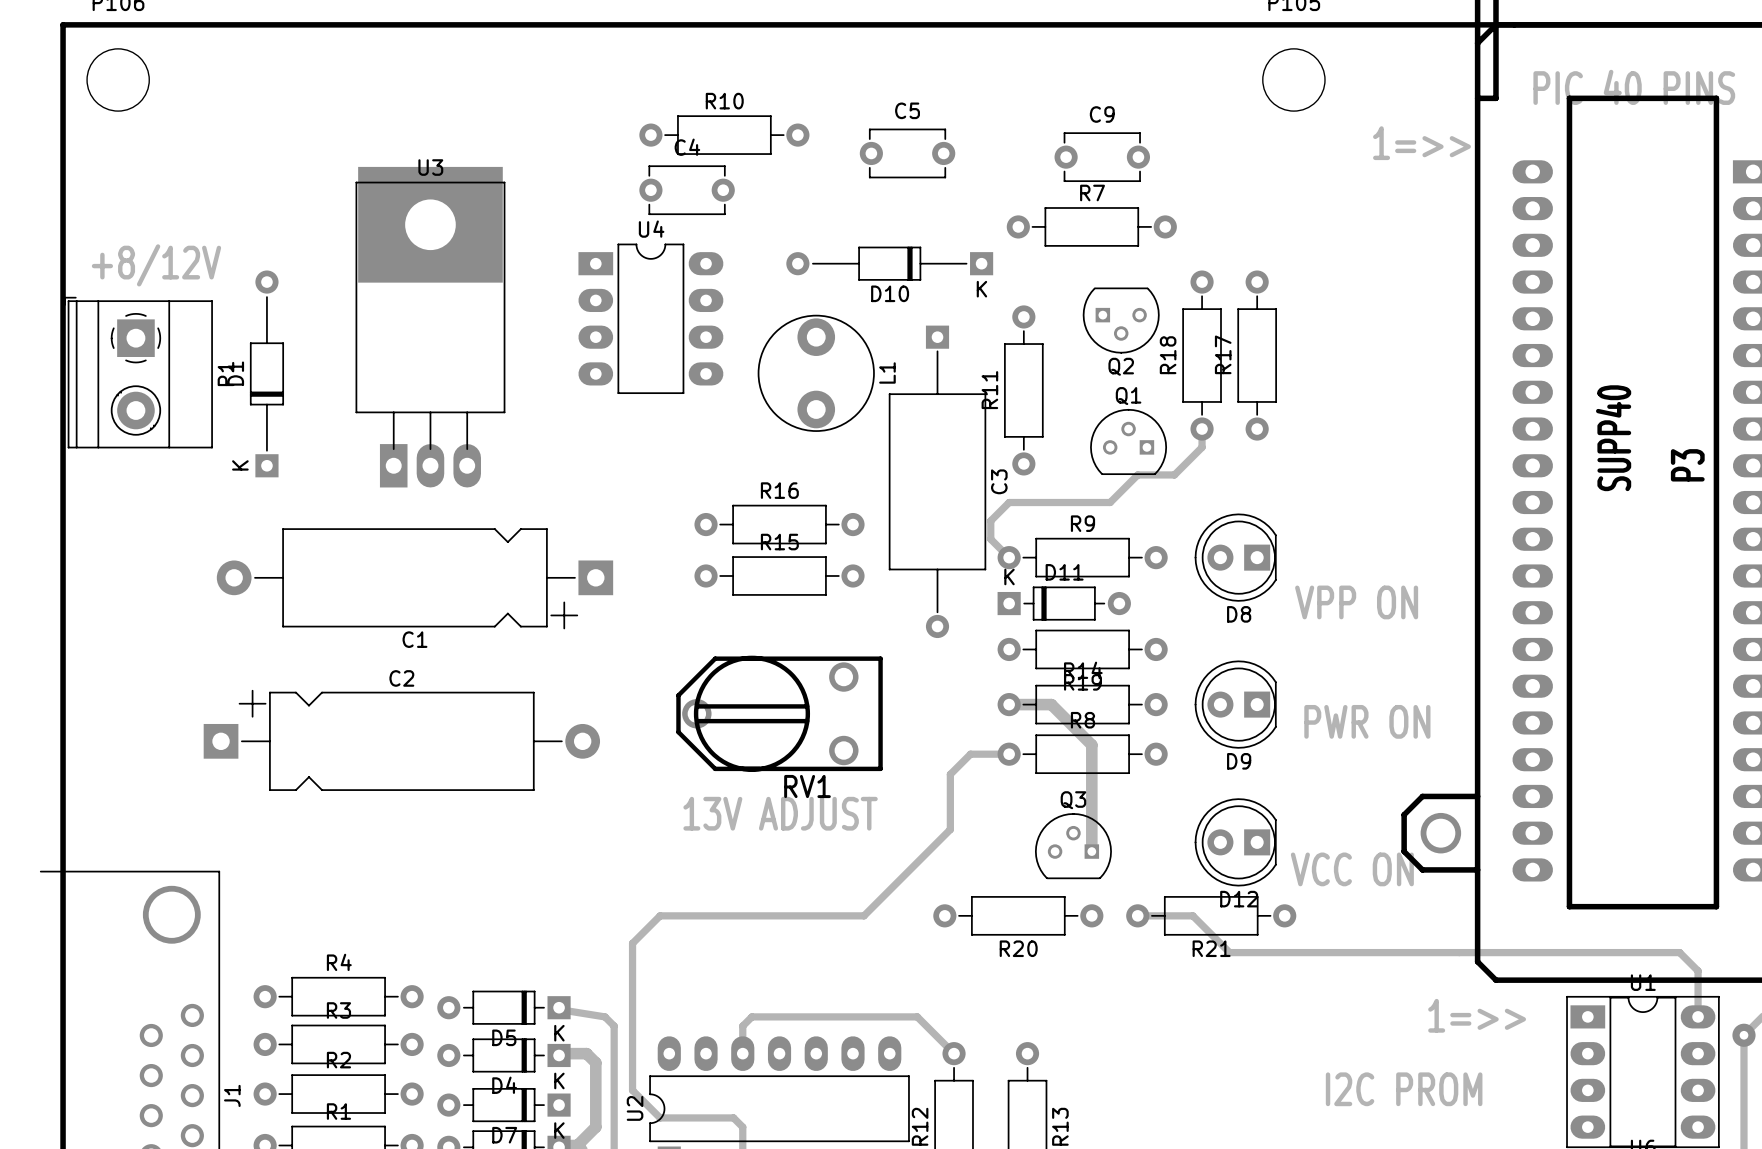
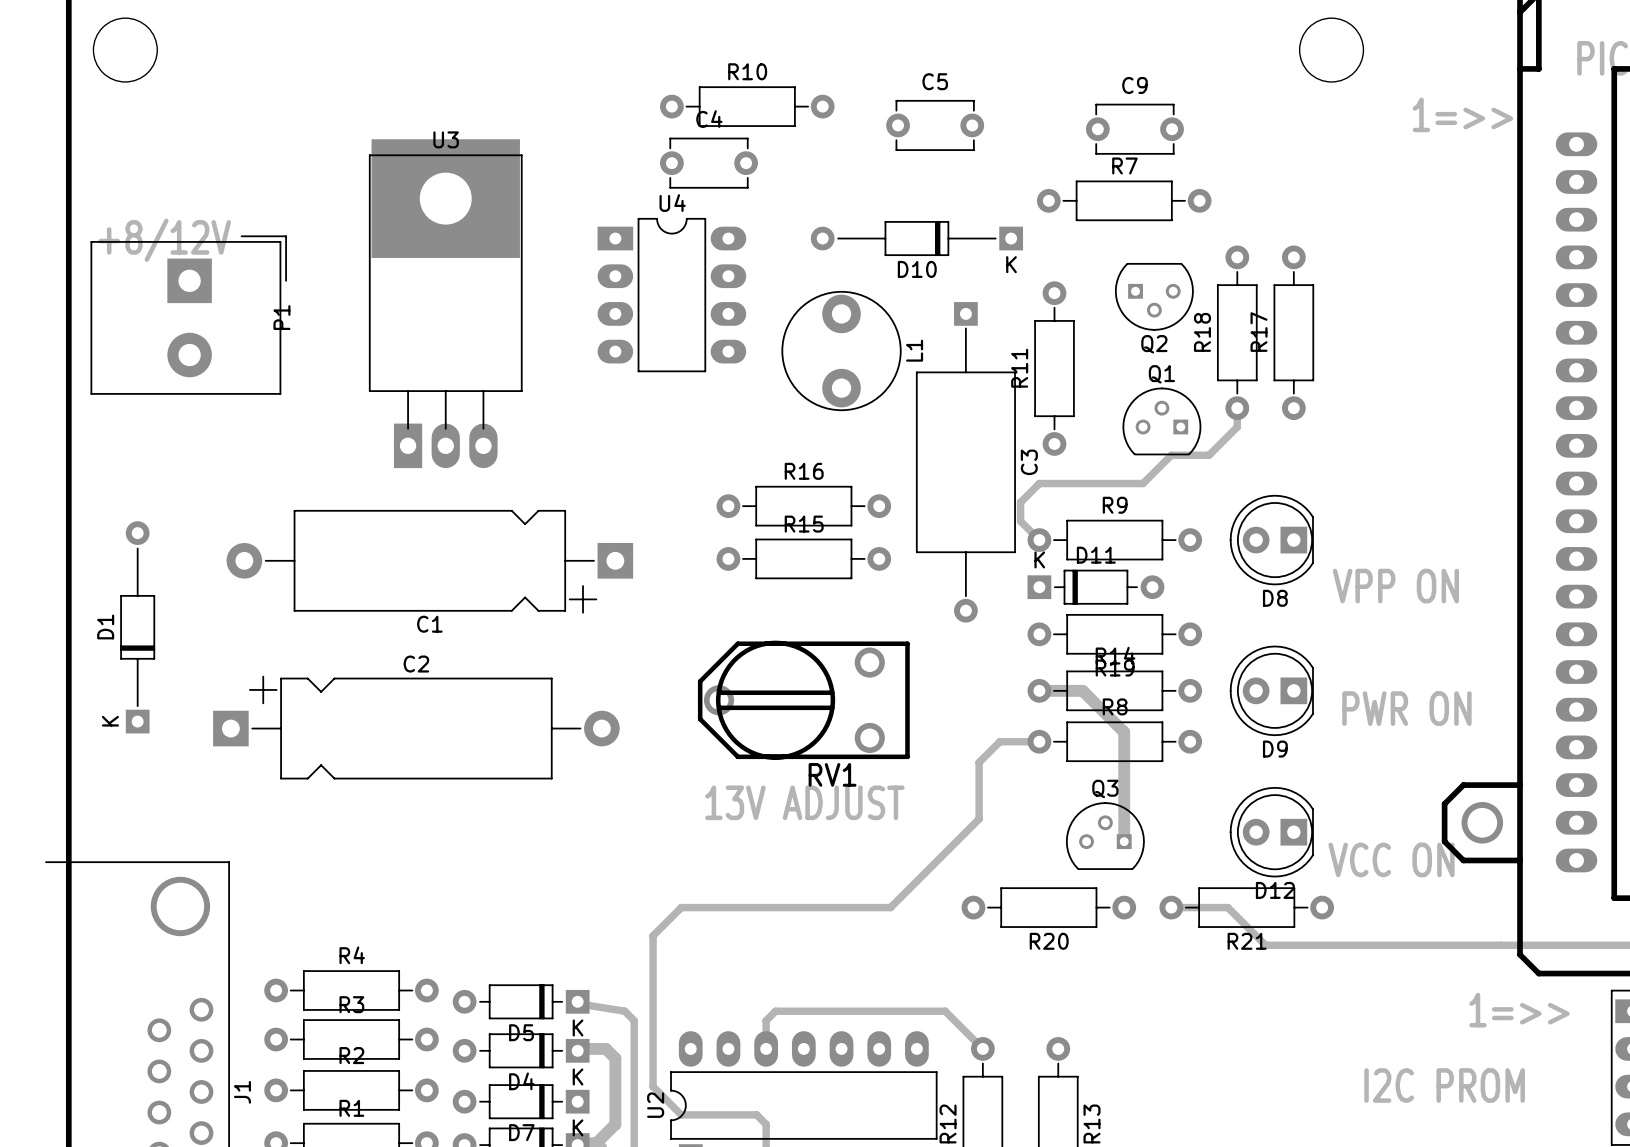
P1 footprint: [64, 296, 213, 449] -> [90, 235, 287, 395]
D1 position: (266, 373) -> (137, 627)

